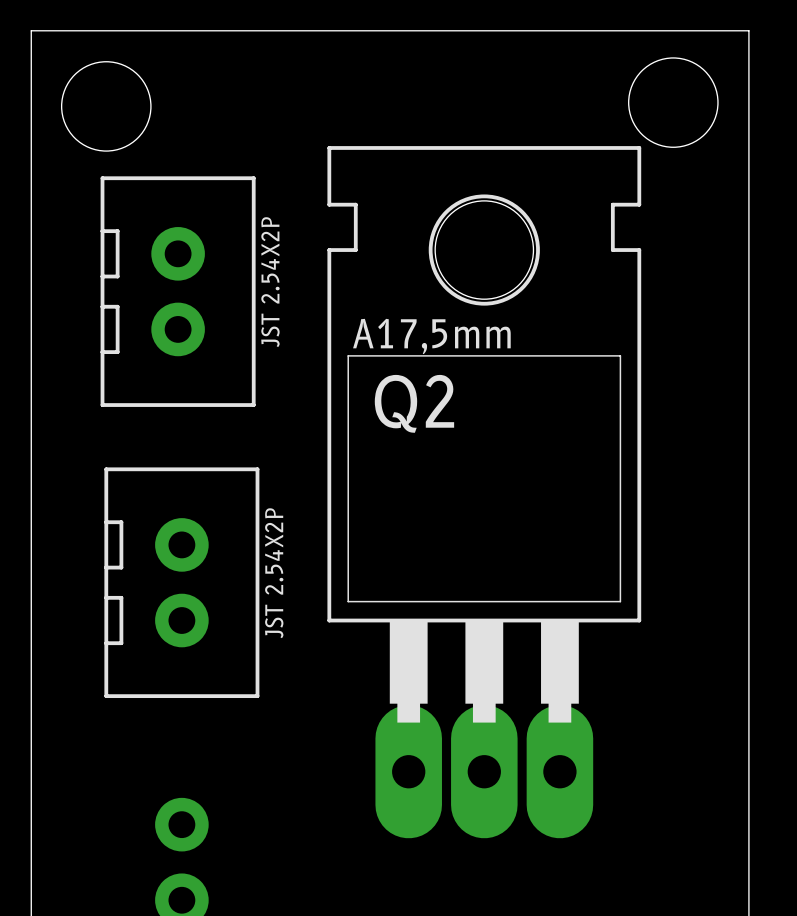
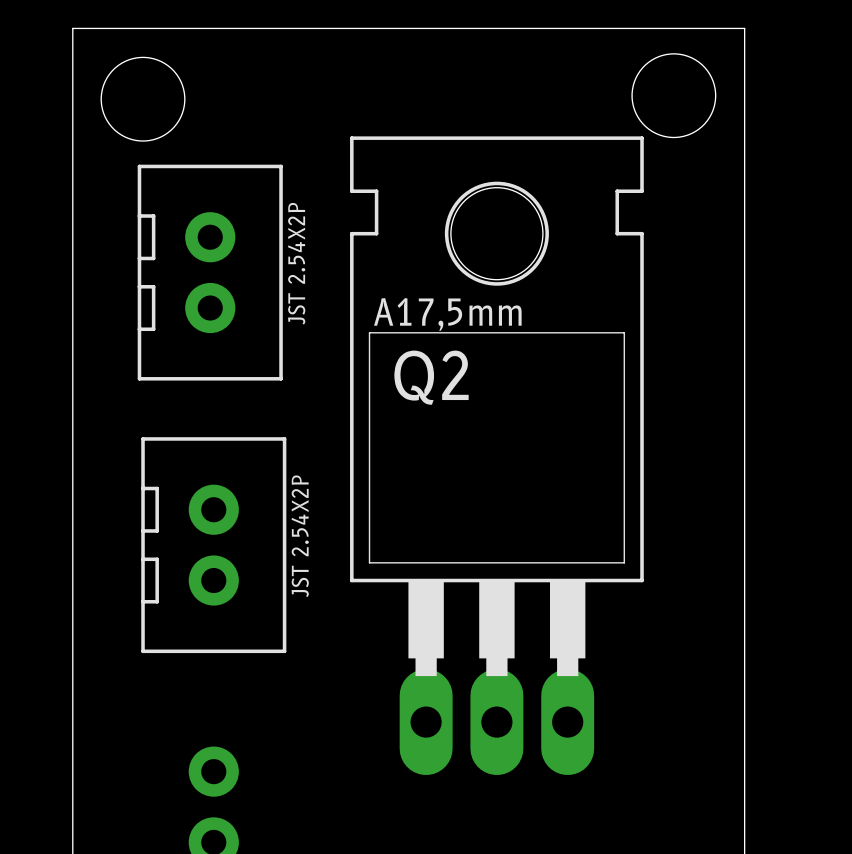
Q2 footprint: [327, 146, 642, 839] -> [350, 136, 644, 776]

